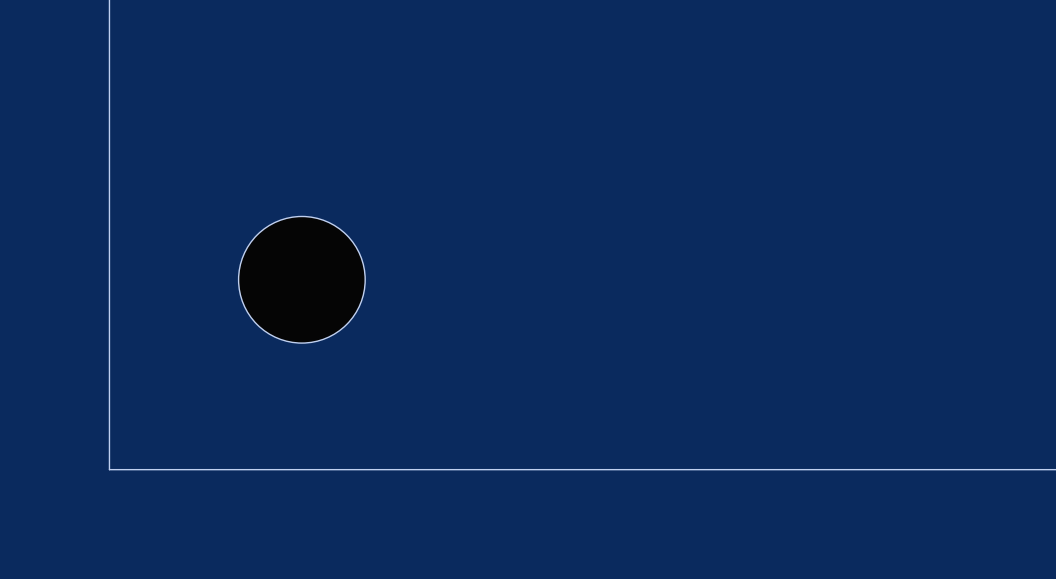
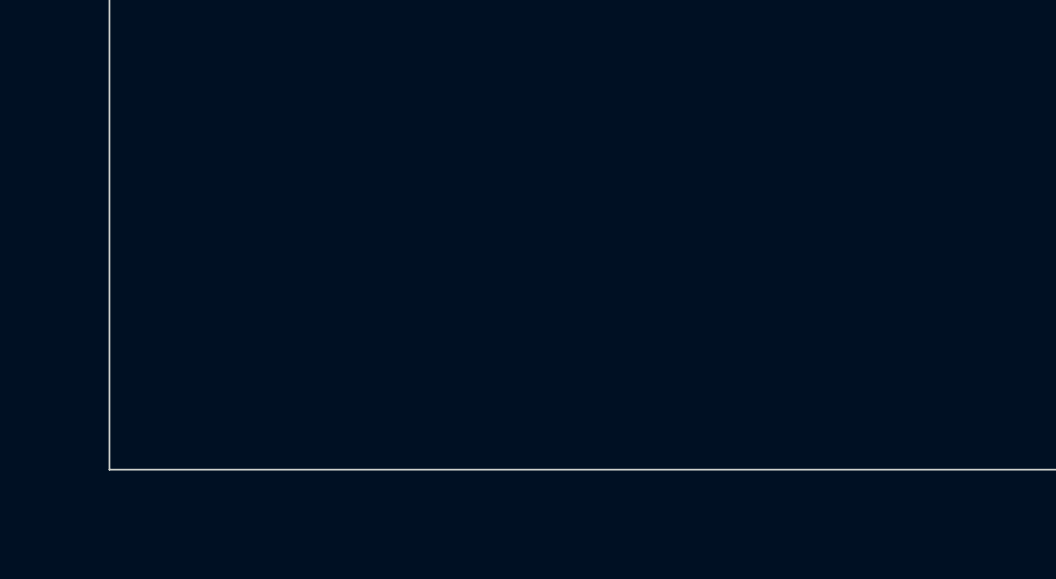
hole: (301, 279) -> none

